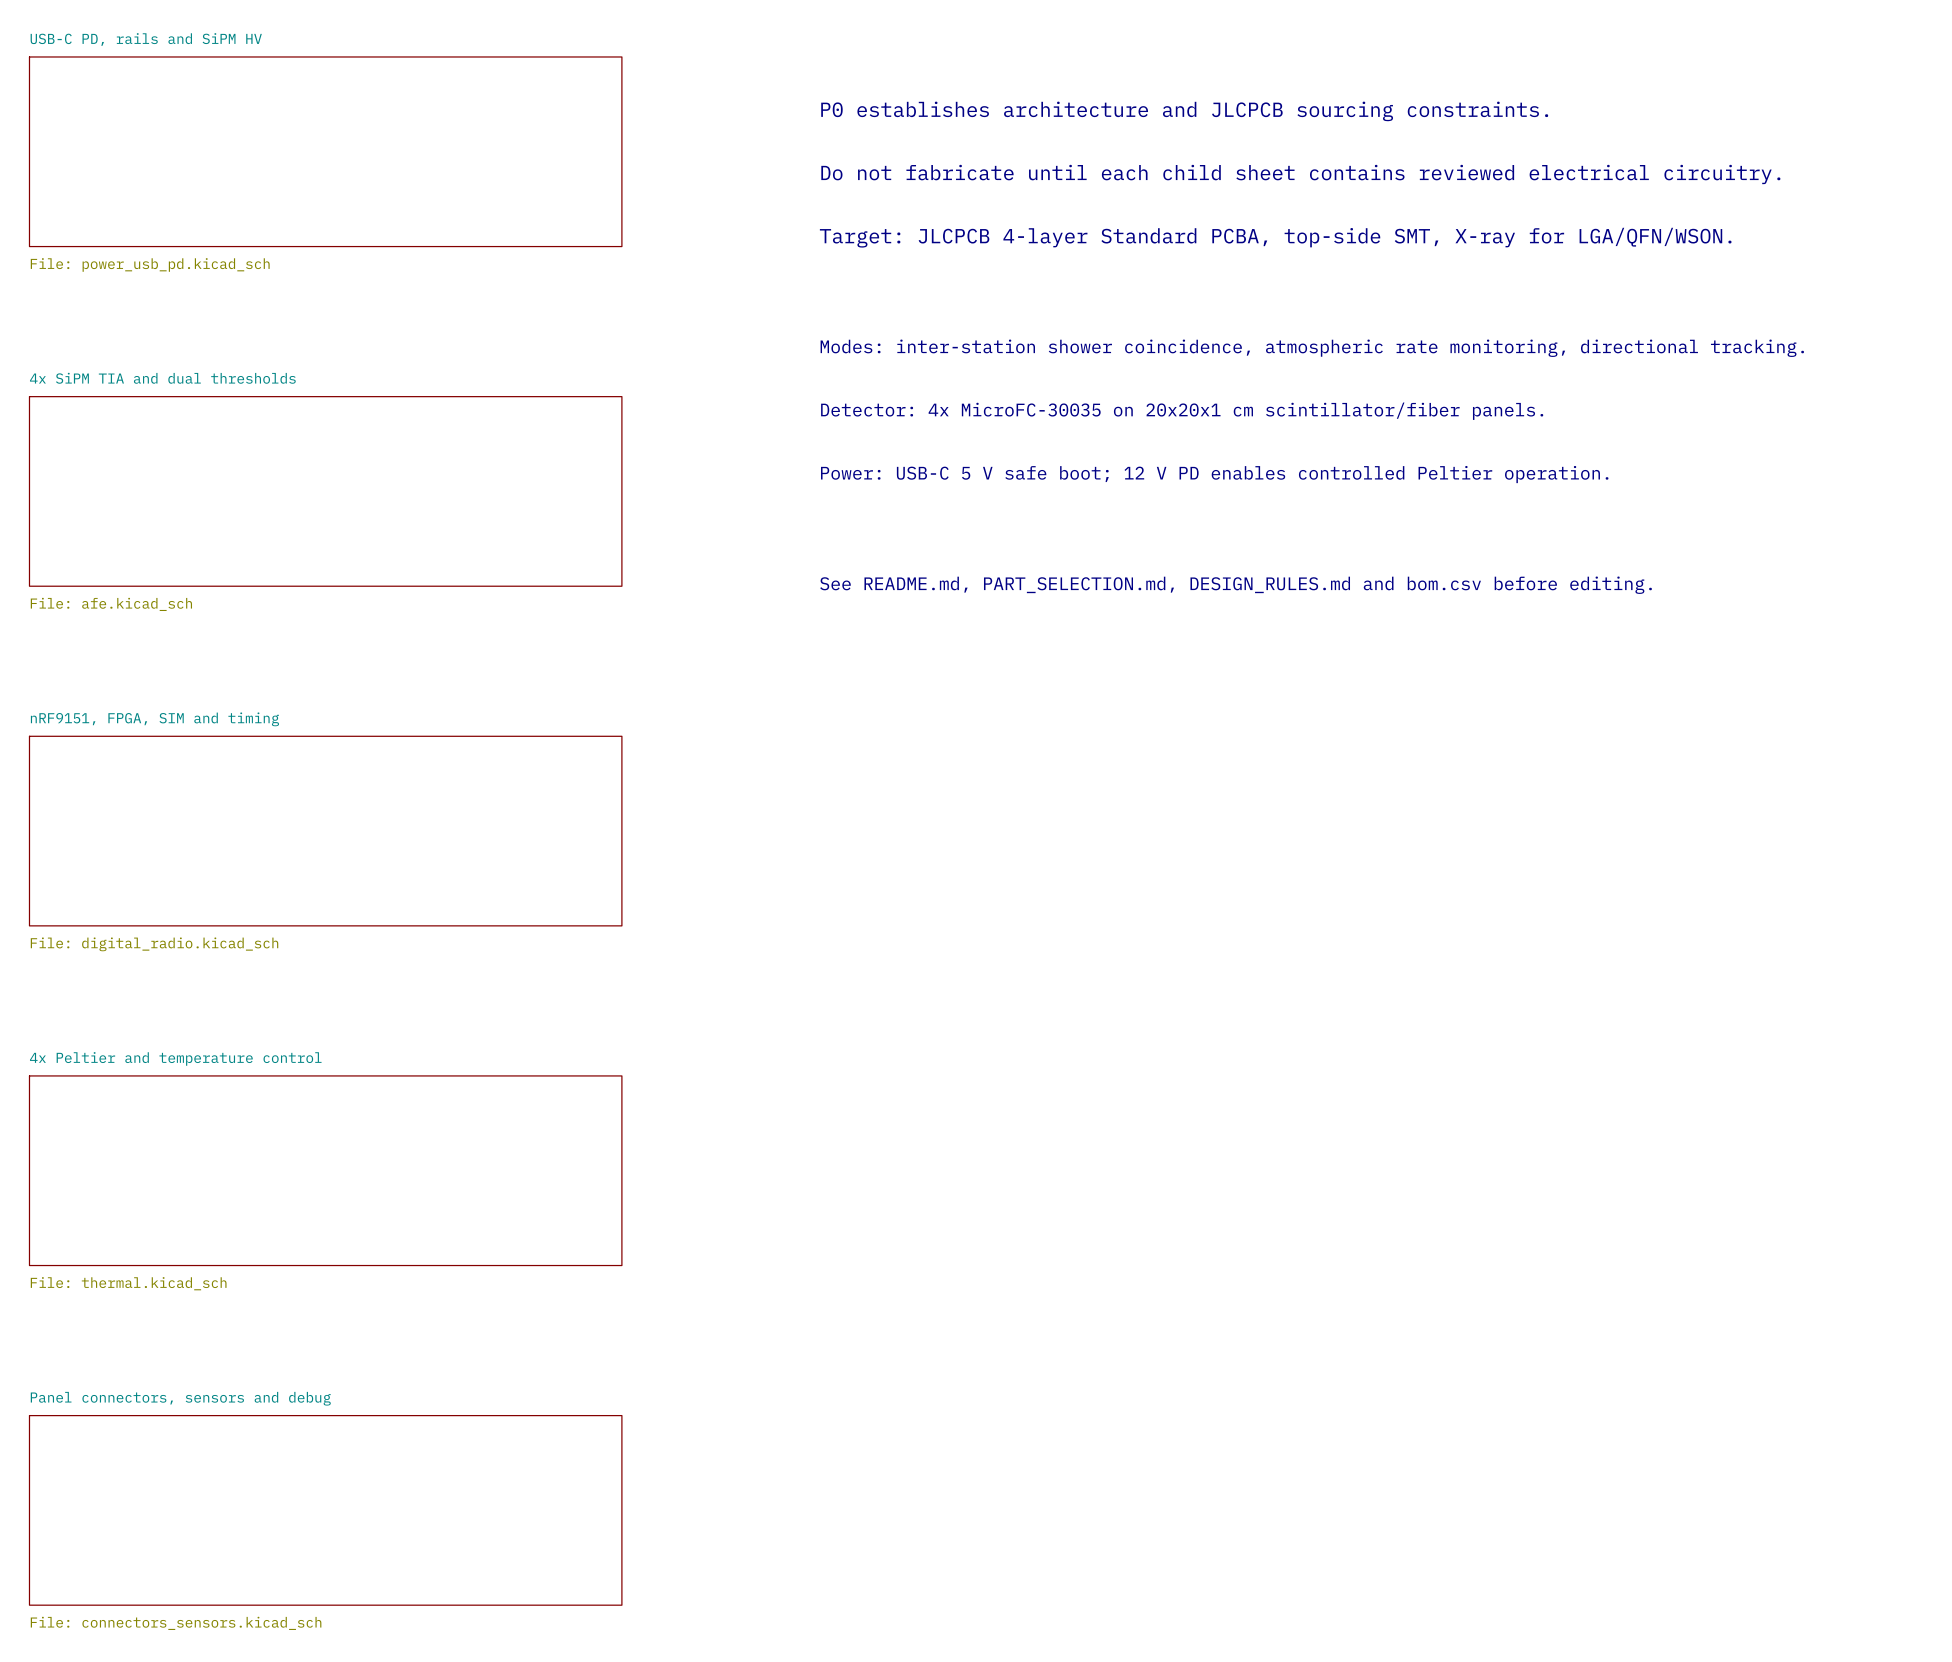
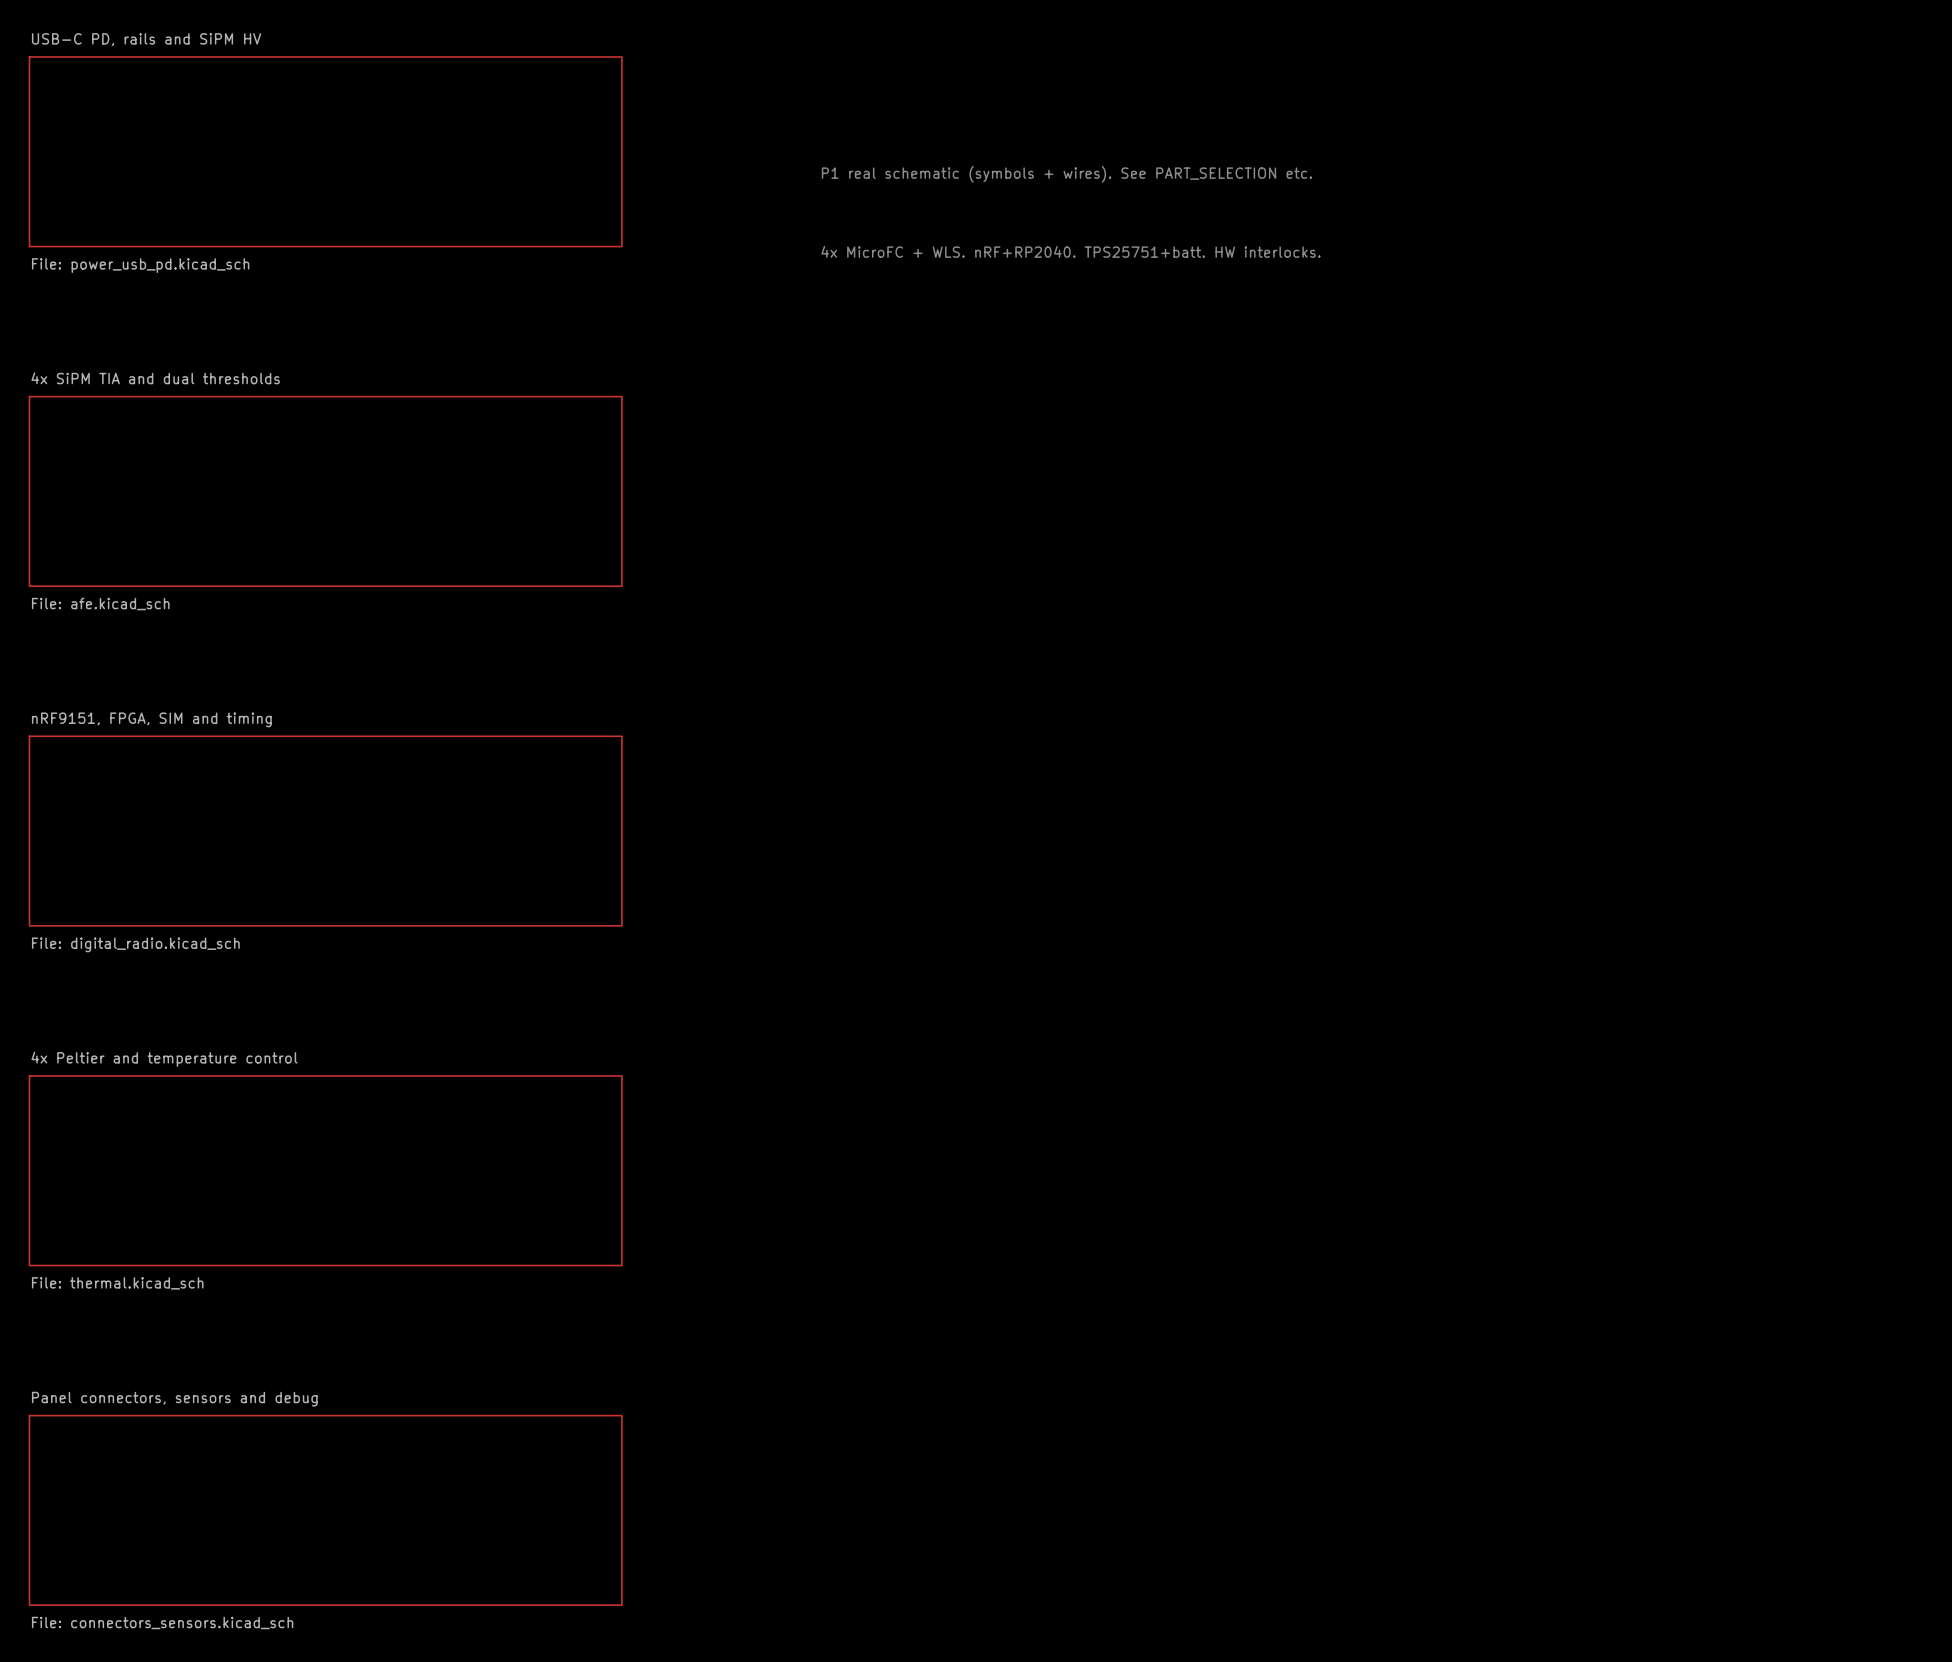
text: P0 establishes architecture and JLCPCB sourcing constraints. (1184, 111) -> none
text: Do not fabricate until each child sheet contains reviewed electrical circuitry. (1300, 174) -> P1 real schematic (symbols + wires). See PART_SELECTION etc. (1066, 174)
text: Target: JLCPCB 4-layer Standard PCBA, top-side SMT, X-ray for LGA/QFN/WSON. (1275, 237) -> none
text: none -> 4x MicroFC + WLS. nRF+RP2040. TPS25751+batt. HW interlocks. (1070, 251)
text: Modes: inter-station shower coincidence, atmospheric rate monitoring, directional tracking. (1312, 348) -> none
text: Detector: 4x MicroFC-30035 on 20x20x1 cm scintillator/fiber panels. (1182, 411) -> none
text: Power: USB-C 5 V safe boot; 12 V PD enables controlled Peltier operation. (1214, 474) -> none
text: See README.md, PART_SELECTION.md, DESIGN_RULES.md and bom.csv before editing. (1236, 585) -> none

